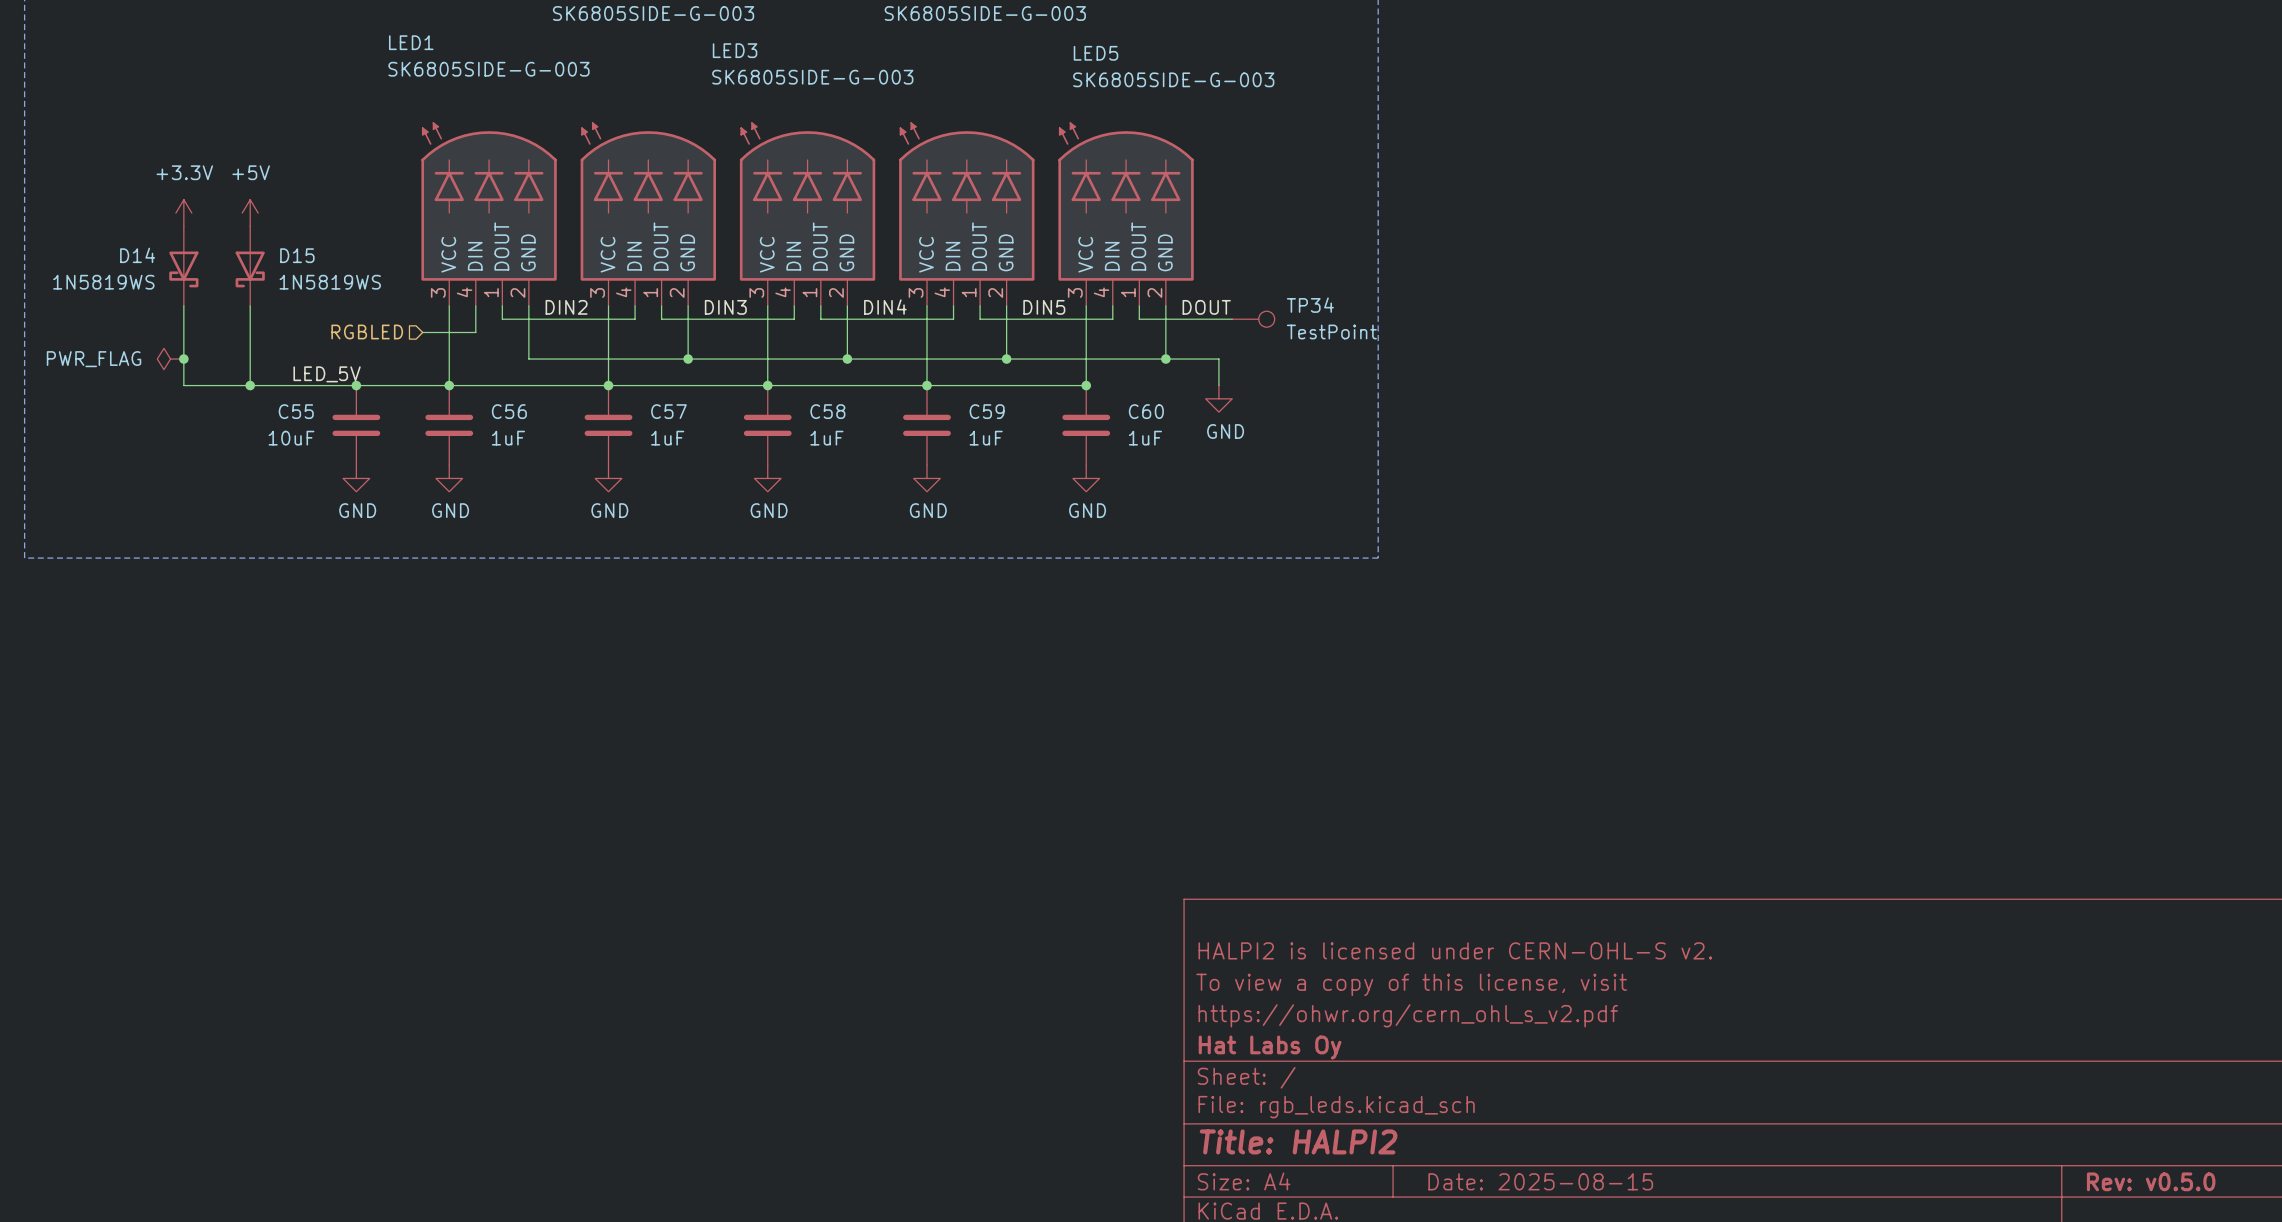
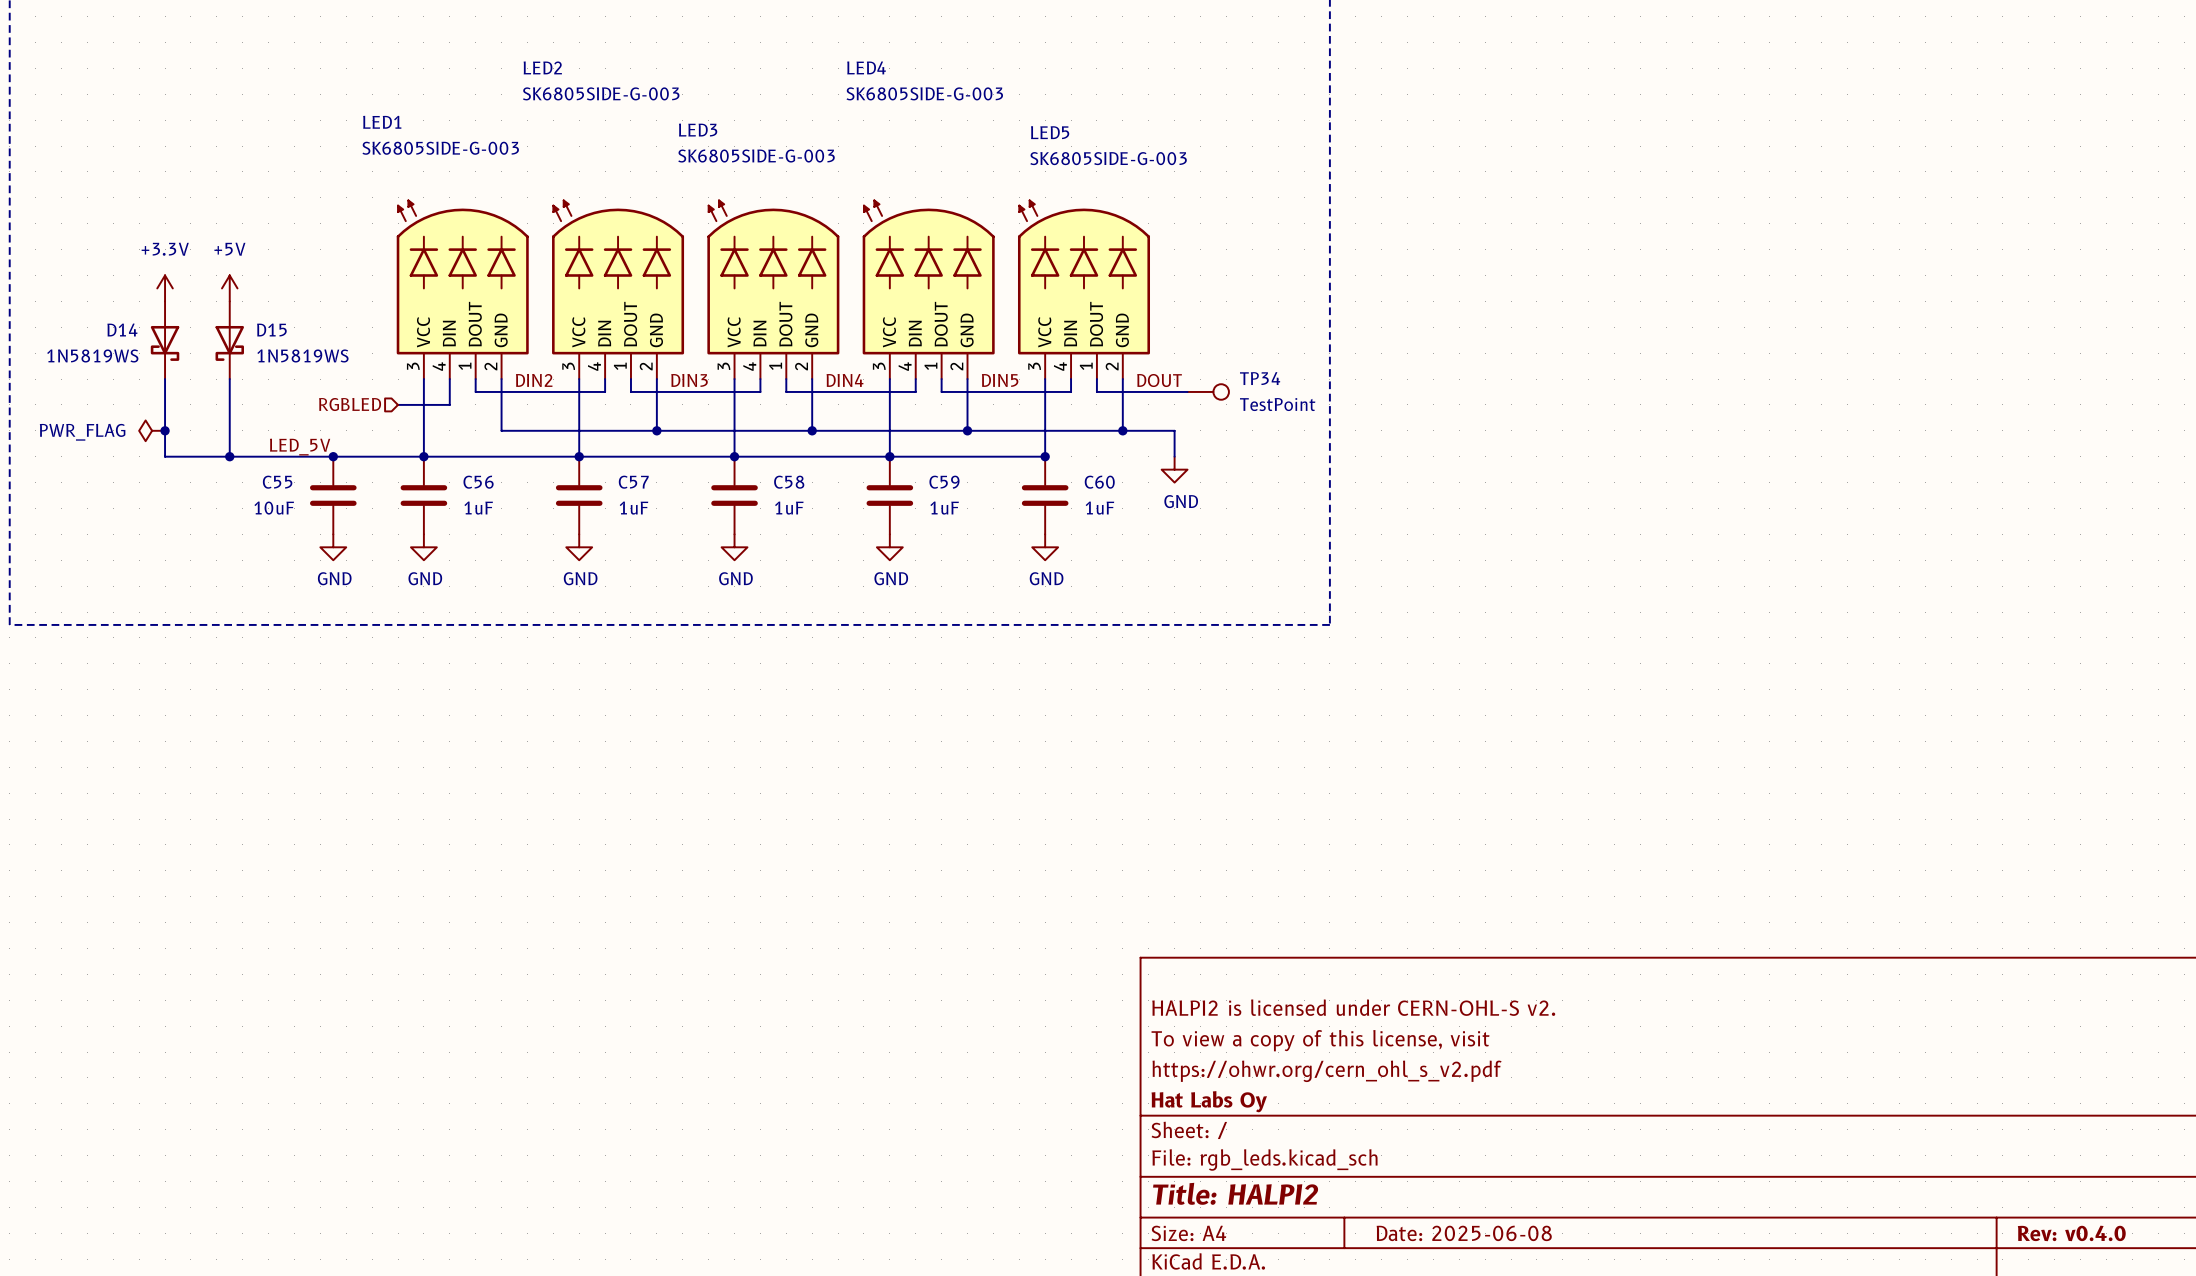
title block: Date: 2025-08-15 (1540, 1181) -> Date: 2025-06-08 (1464, 1233)
title block: Rev: v0.5.0 (2151, 1181) -> Rev: v0.4.0 (2071, 1233)

